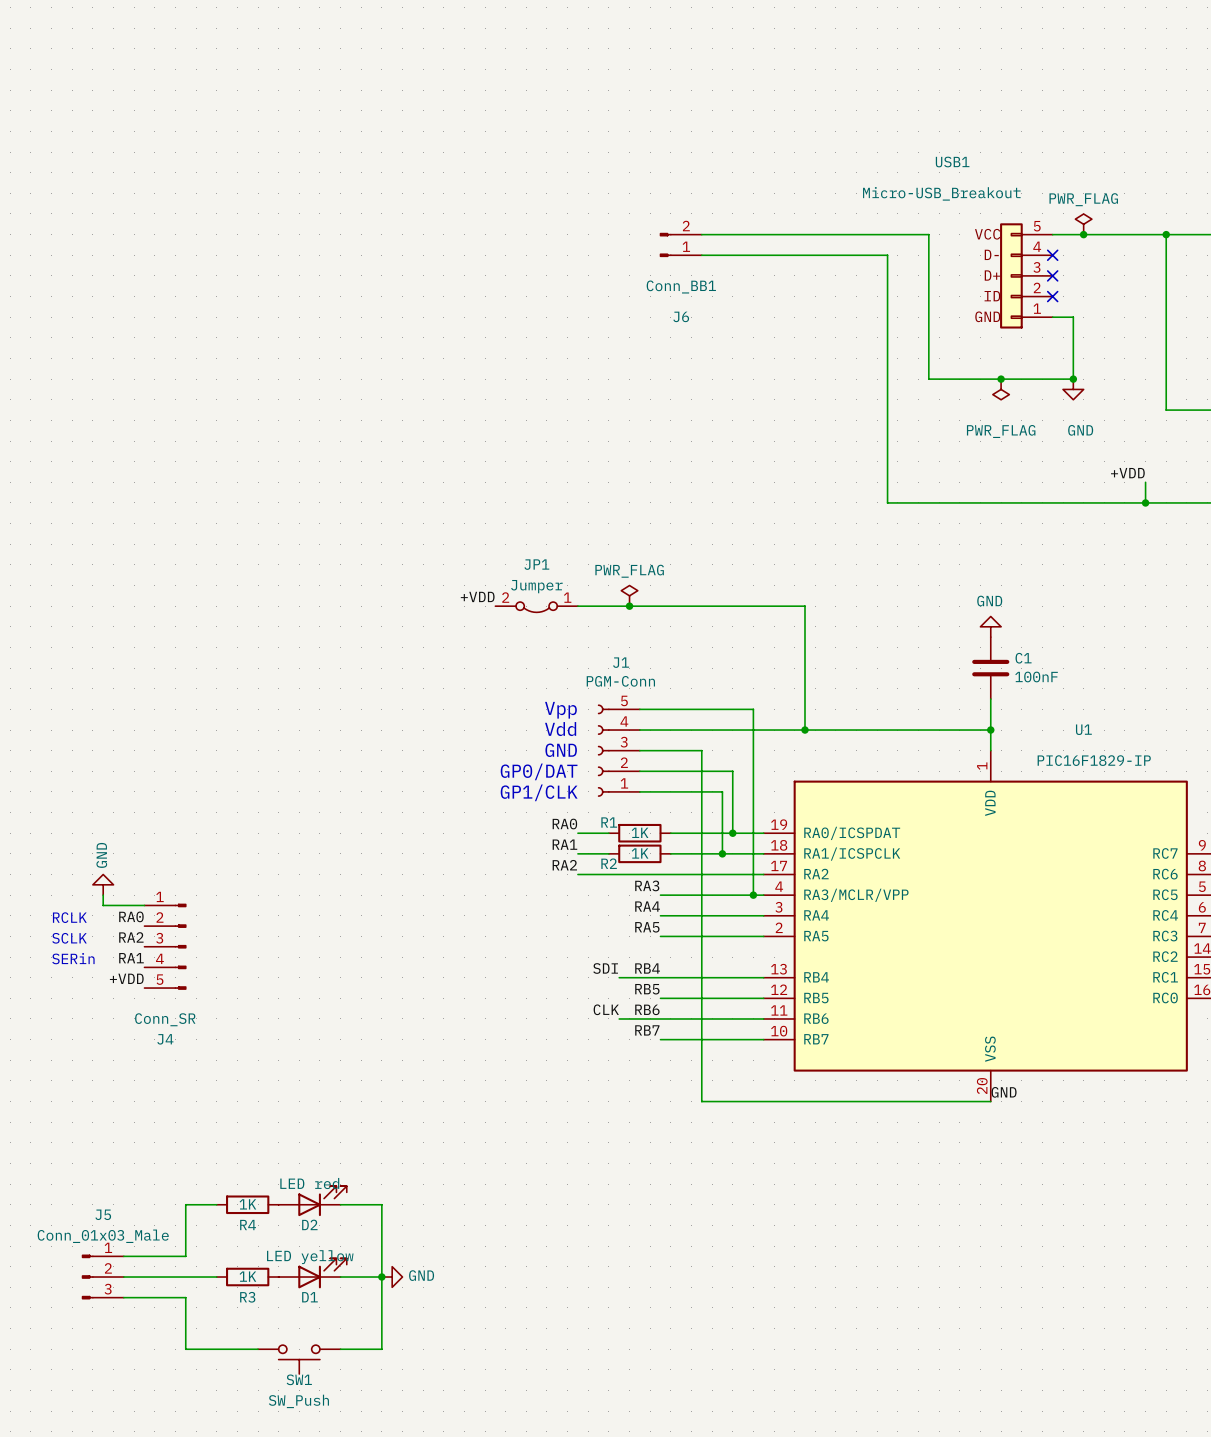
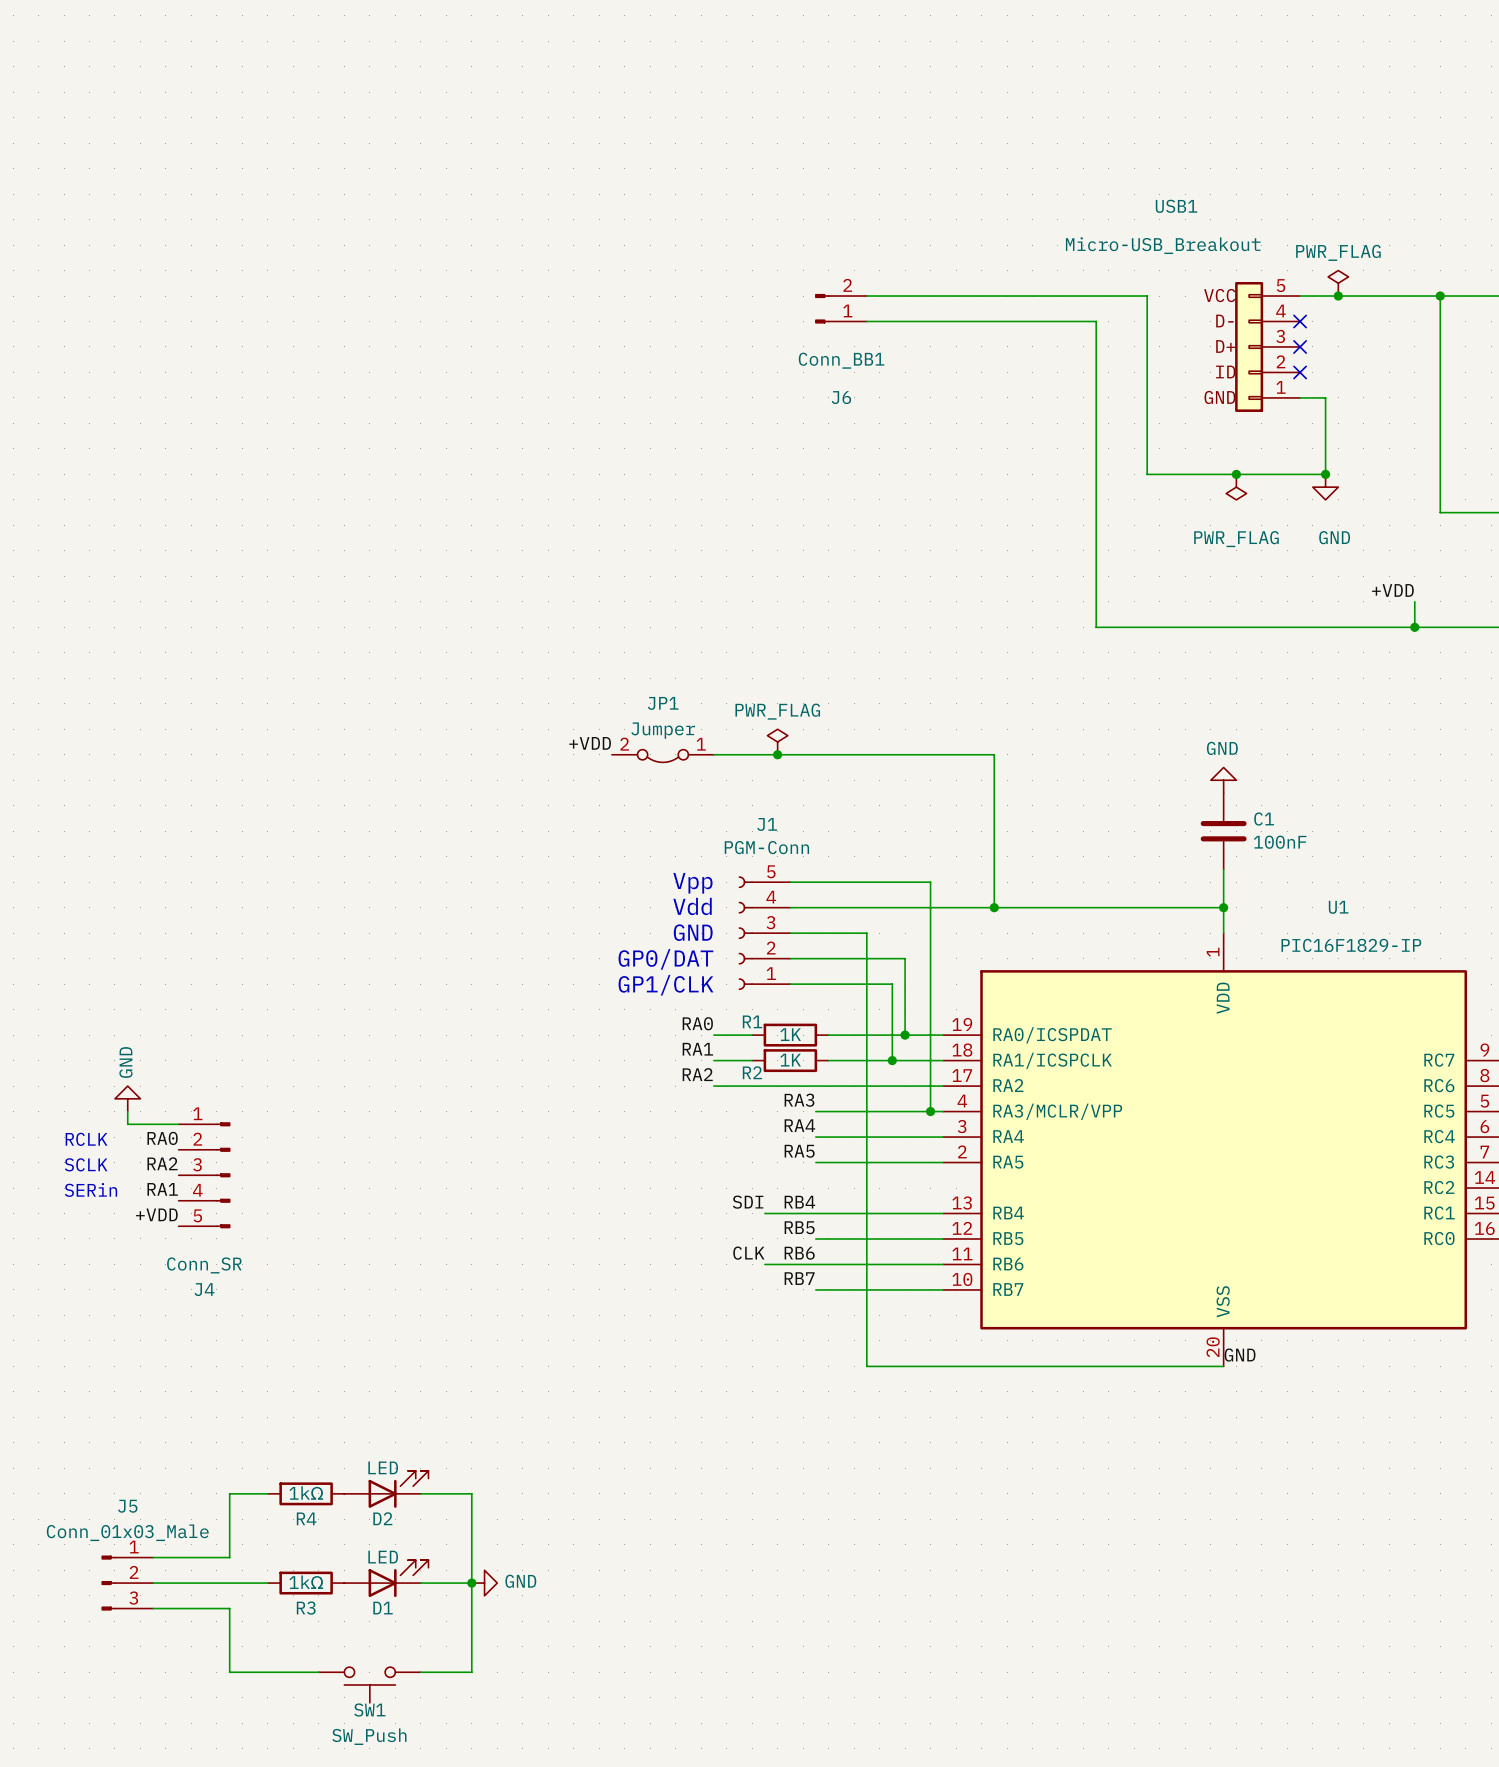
D2 value: LED red (309, 1183) -> LED (383, 1467)
R4 value: 1K (247, 1204) -> 1kΩ (306, 1492)
D1 value: LED yellow (310, 1257) -> LED (383, 1557)
R3 value: 1K (247, 1276) -> 1kΩ (306, 1582)

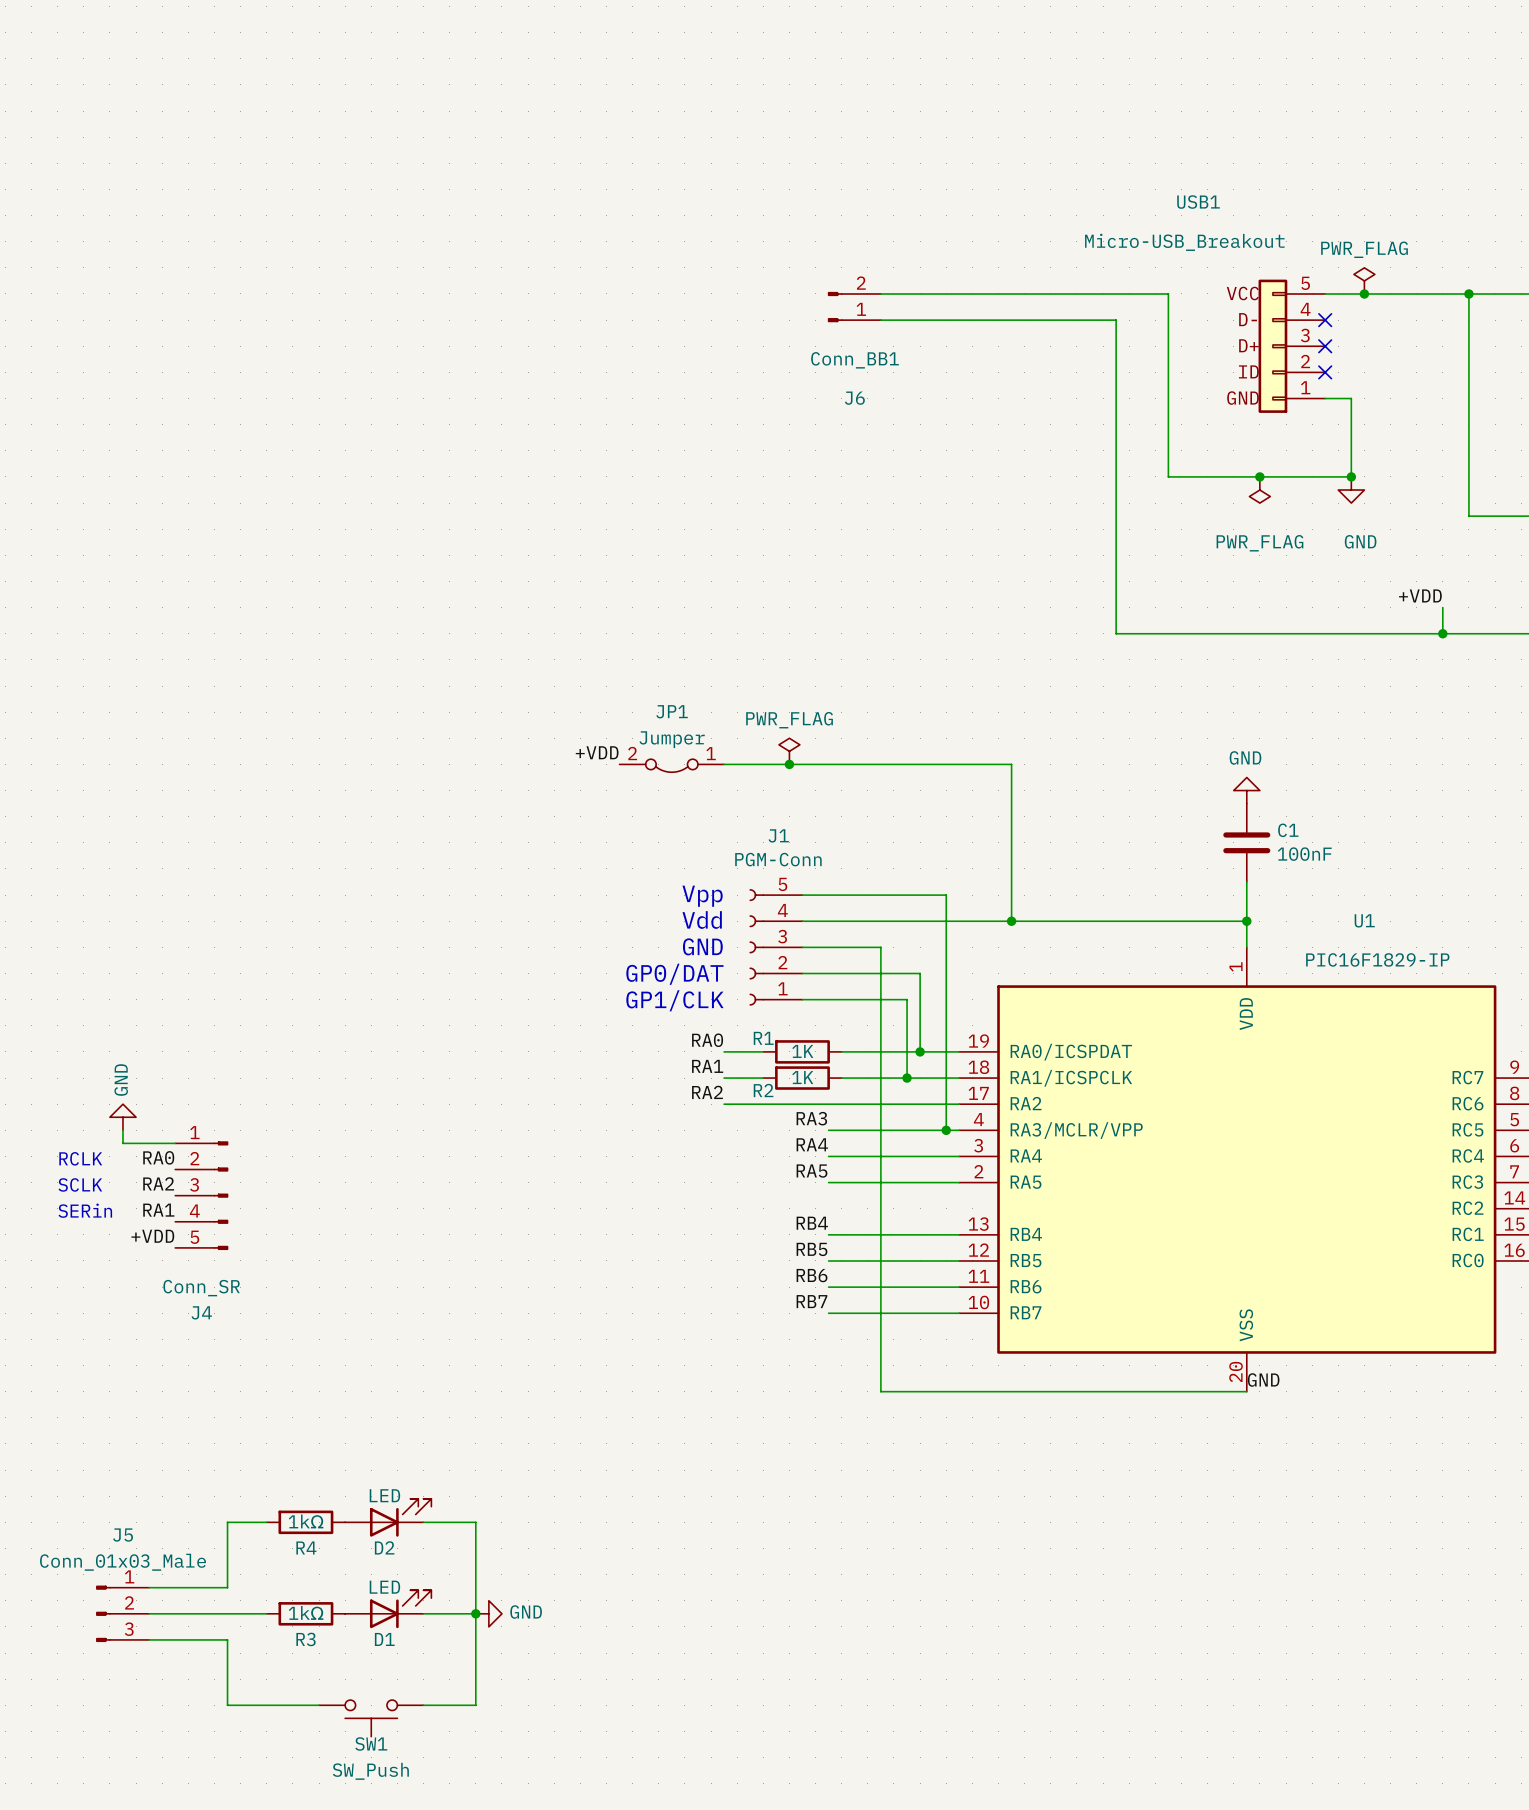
label: SDI (748, 1202) -> none
wire: (764, 1213) (815, 1213) -> none
label: CLK (748, 1253) -> none
wire: (764, 1264) (815, 1264) -> none

